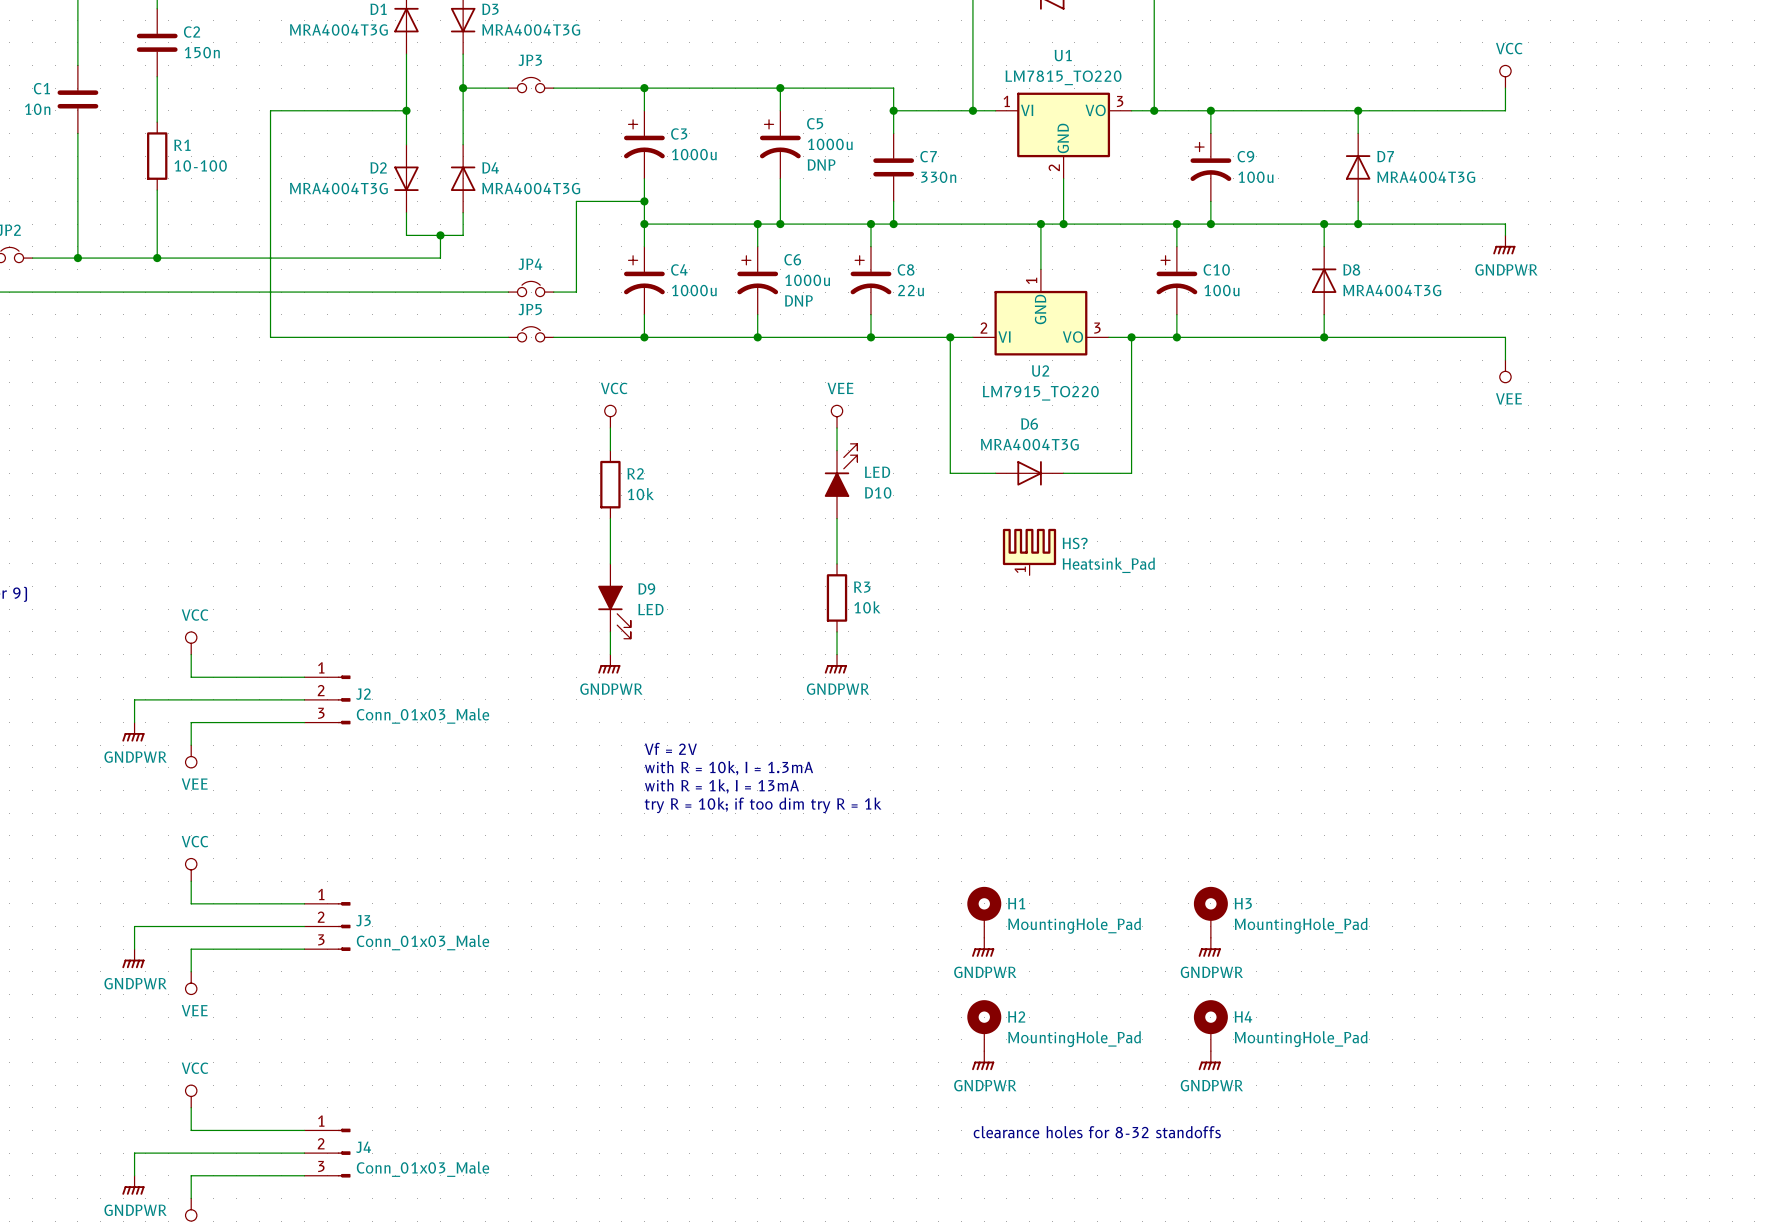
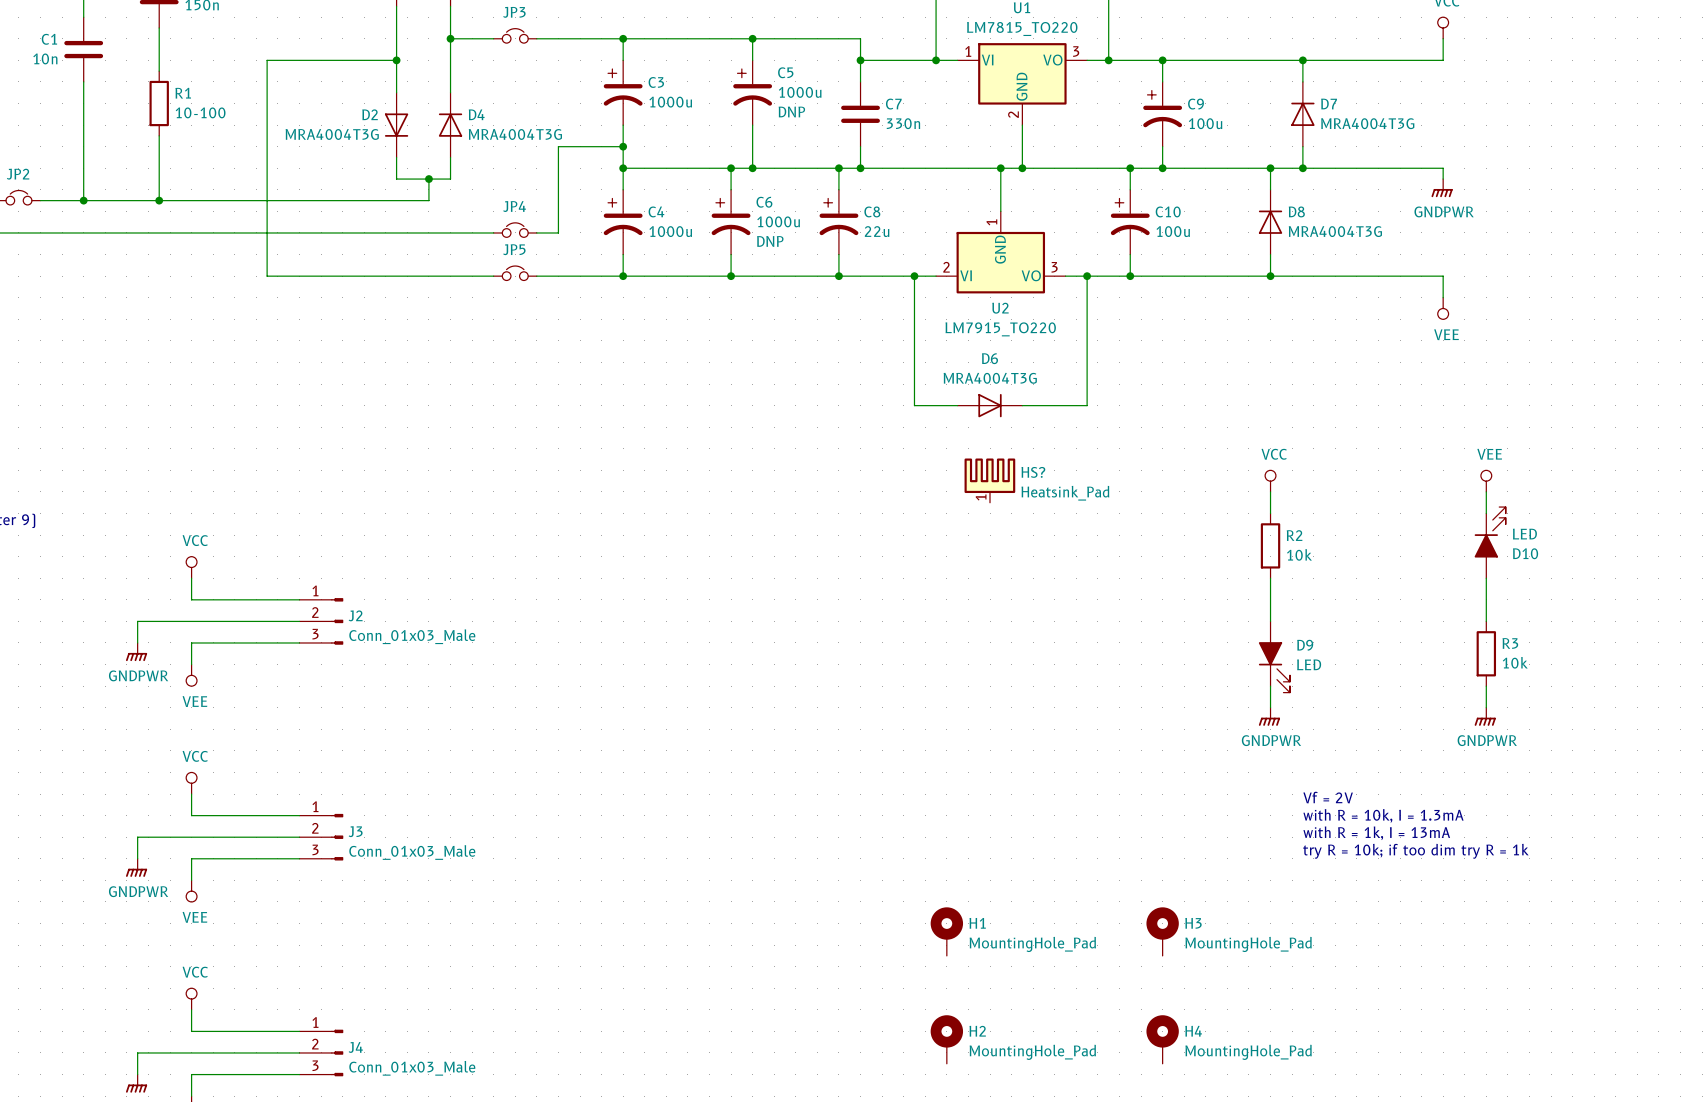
power symbol: VCC (610, 416) -> none
power symbol: VEE (837, 416) -> none
wire: (610, 428) (610, 450) -> none
wire: (837, 428) (837, 450) -> none
D10 position: (841, 481) -> (1490, 542)
R2 position: (610, 484) -> (1270, 545)
wire: (610, 518) (610, 563) -> none
wire: (837, 518) (837, 563) -> none
power symbol: none -> VCC (1270, 481)
power symbol: none -> VEE (1486, 481)
wire: none -> (1270, 491) (1270, 513)
wire: none -> (1486, 491) (1486, 513)
R3 position: (837, 597) -> (1486, 653)
D9 position: (614, 601) -> (1274, 657)
wire: (610, 631) (610, 654) -> none
wire: (837, 631) (837, 654) -> none
wire: none -> (1270, 578) (1270, 621)
wire: none -> (1486, 578) (1486, 621)
power symbol: GNDPWR (609, 664) -> none
power symbol: GNDPWR (835, 664) -> none
text: Vf = 2V (670, 748) -> none
wire: none -> (1270, 686) (1270, 707)
wire: none -> (1486, 686) (1486, 707)
text: with R = 10k, I = 1.3mA (729, 768) -> none
text: with R = 1k, I = 13mA (721, 786) -> none
power symbol: none -> GNDPWR (1269, 716)
power symbol: none -> GNDPWR (1485, 716)
text: try R = 10k; if too dim try R = 1k (763, 805) -> none
text: none -> Vf = 2V (1328, 797)
text: none -> with R = 10k, I = 1.3mA (1383, 815)
H1: MountingHole_Pad (984, 912) -> none
H3: MountingHole_Pad (1210, 912) -> none
text: none -> with R = 1k, I = 13mA (1376, 833)
text: none -> try R = 10k; if too dim try R = 1k (1415, 851)
power symbol: GNDPWR (983, 947) -> none
power symbol: GNDPWR (1209, 947) -> none
H2 name: H2 (1016, 1016) -> H1 (977, 923)
H4 name: H4 (1243, 1016) -> H3 (1193, 923)
power symbol: GNDPWR (983, 1060) -> none
power symbol: GNDPWR (1209, 1060) -> none
text: clearance holes for 8-32 standoffs (1097, 1132) -> none
H2: none -> MountingHole_Pad (946, 1039)
H4: none -> MountingHole_Pad (1162, 1039)

